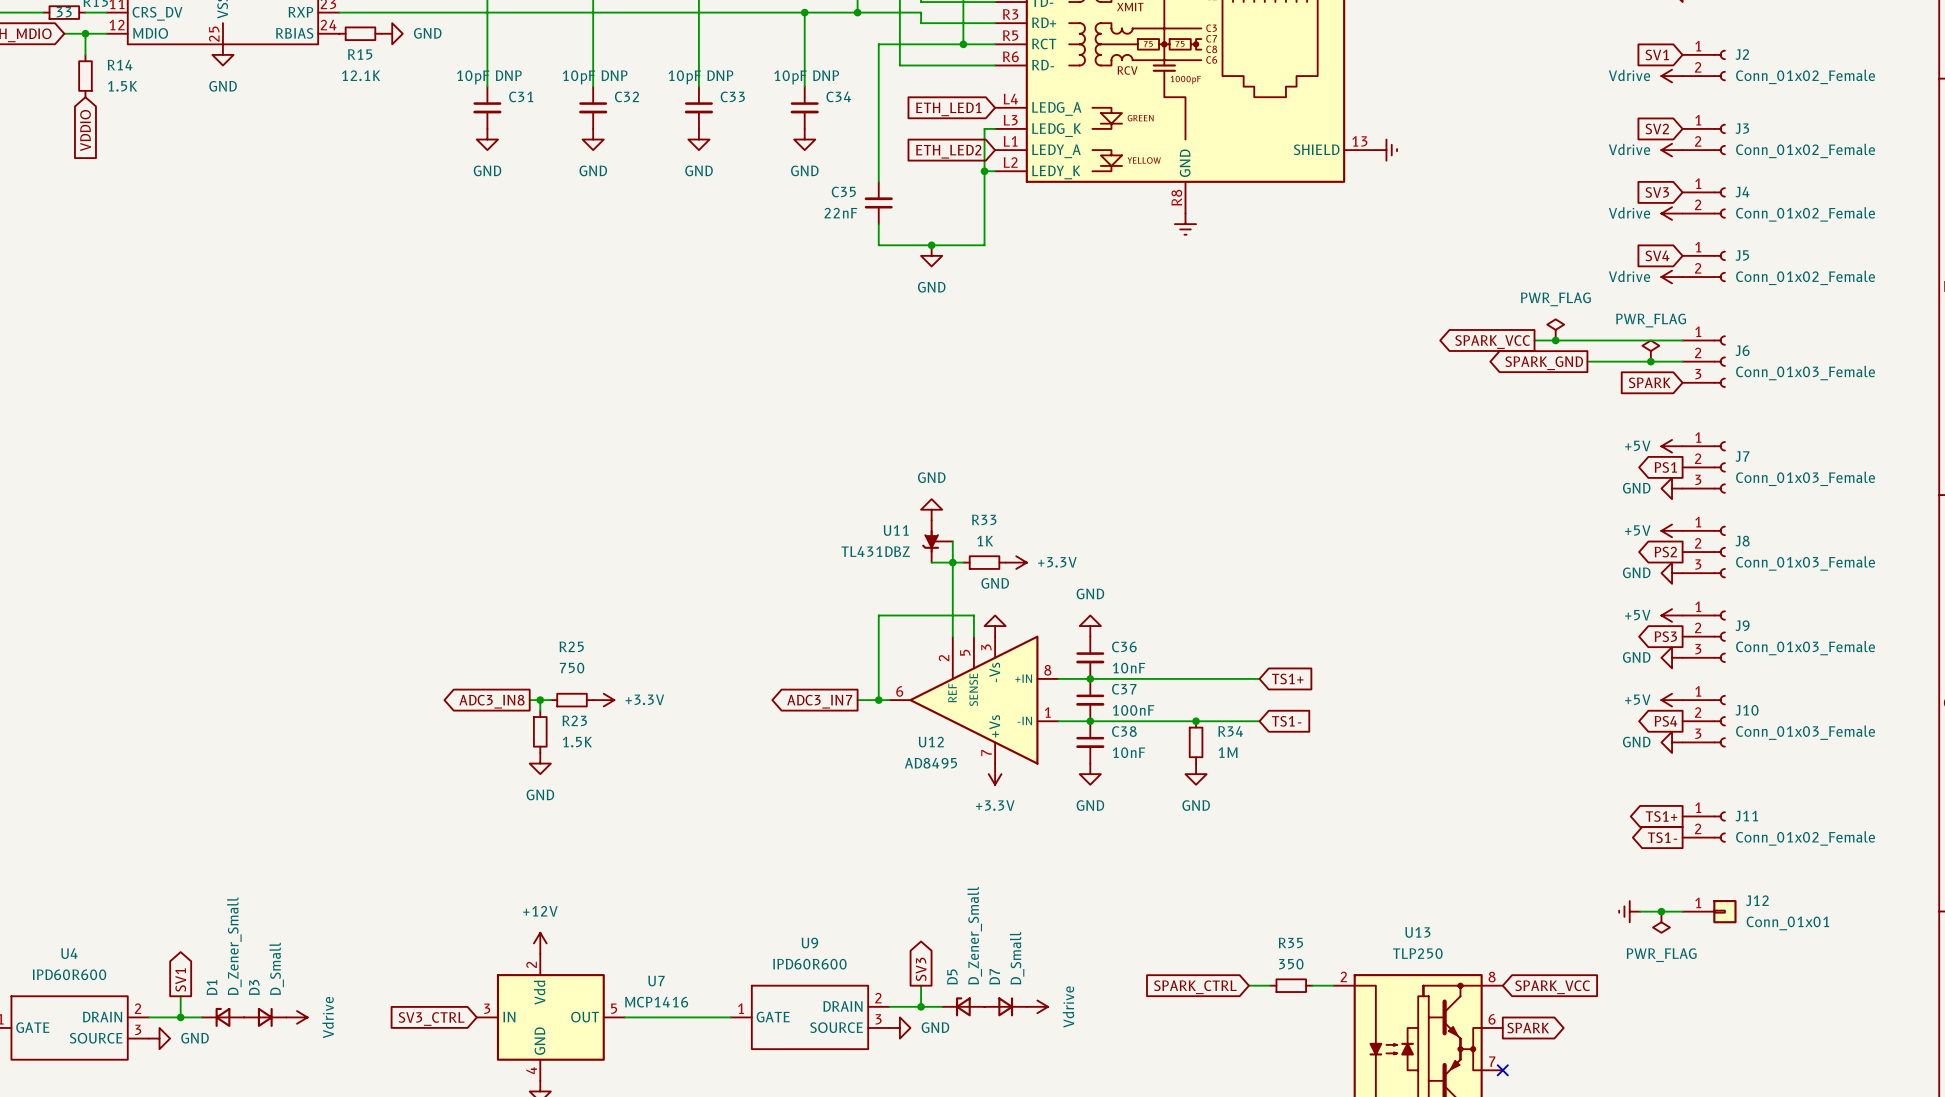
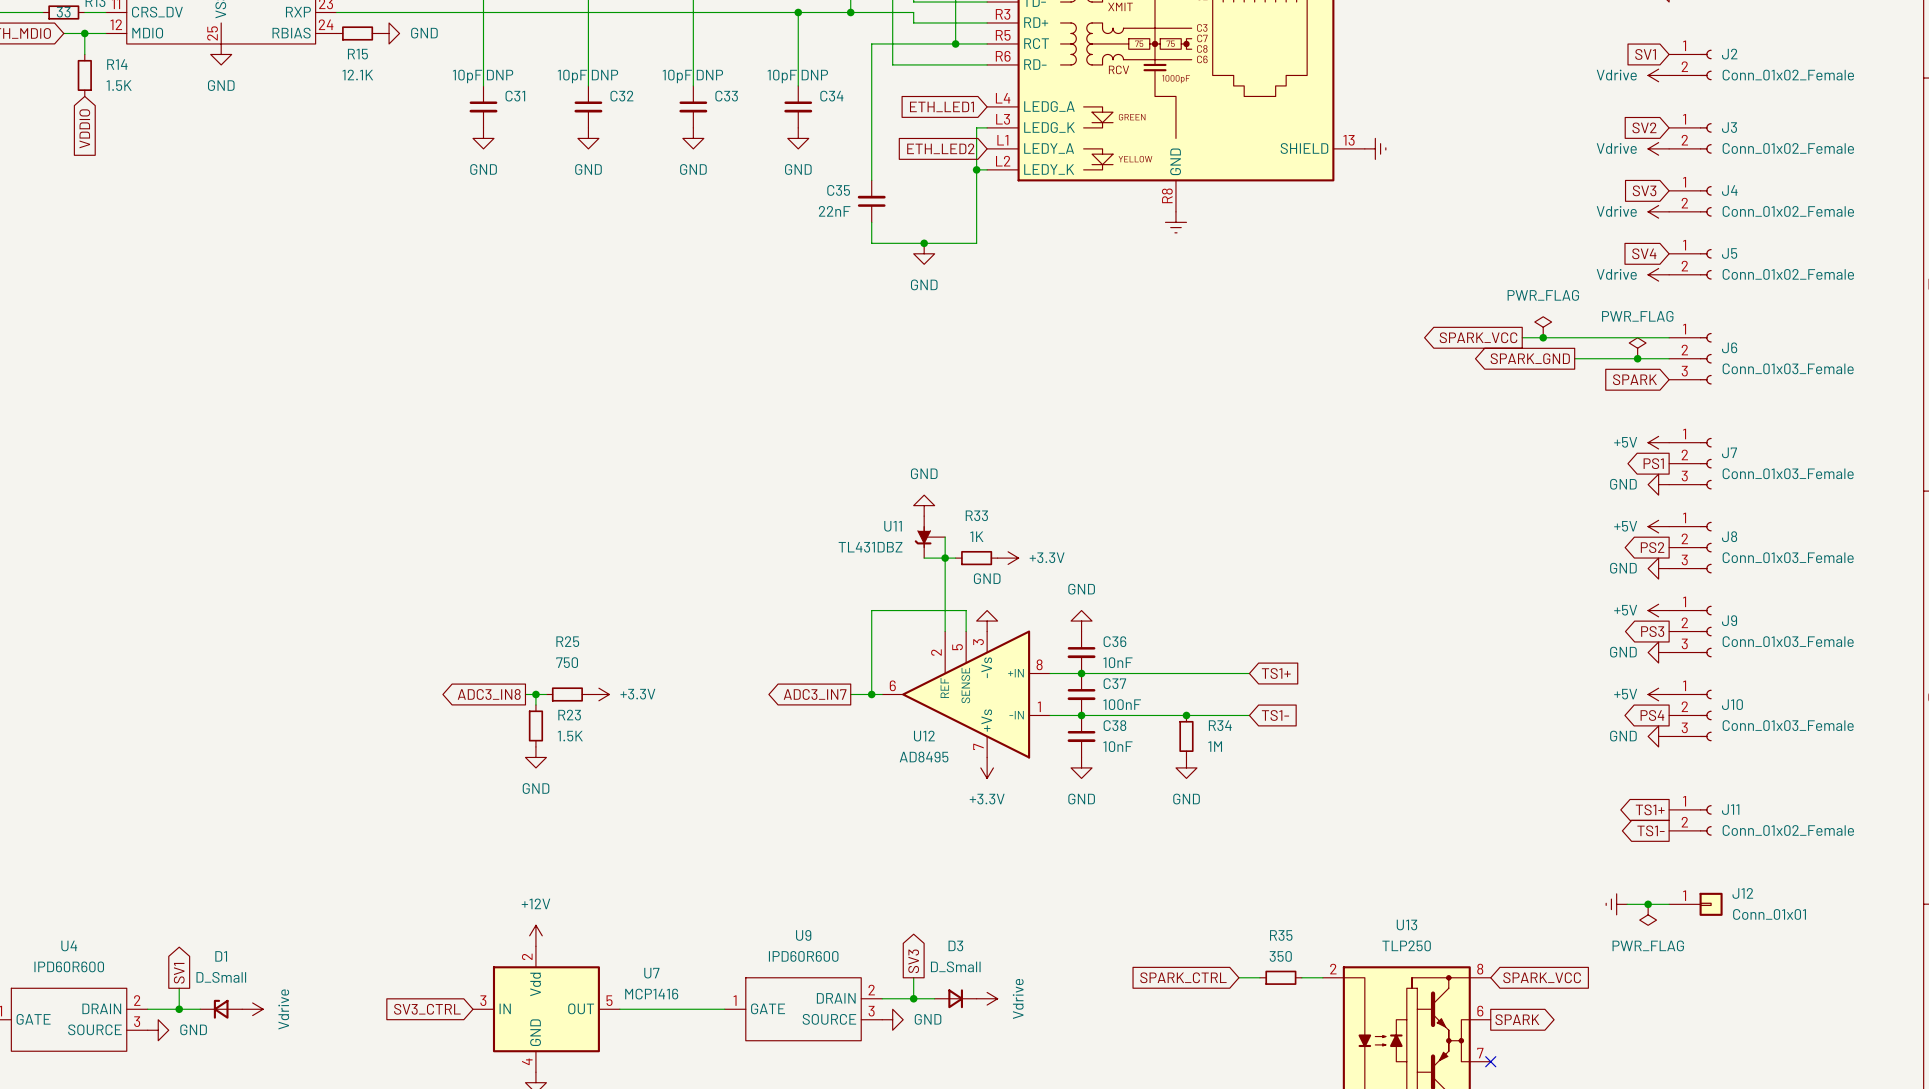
D1 value: D_Zener_Small (234, 946) -> D_Small (221, 977)
D3 value rotation: 0° (276, 968) -> 90° clockwise (955, 966)
D1 name rotation: 0° (212, 987) -> 90° clockwise (221, 956)
D3 name rotation: 0° (254, 987) -> 90° clockwise (955, 945)
D5: D_Zener_Small (963, 1006) -> none
D7: D_Small (1005, 1006) -> none
power symbol position: Vdrive (1037, 1006) -> Vdrive (987, 998)
D3 position: (265, 1017) -> (955, 998)
power symbol position: Vdrive (297, 1017) -> Vdrive (252, 1009)

